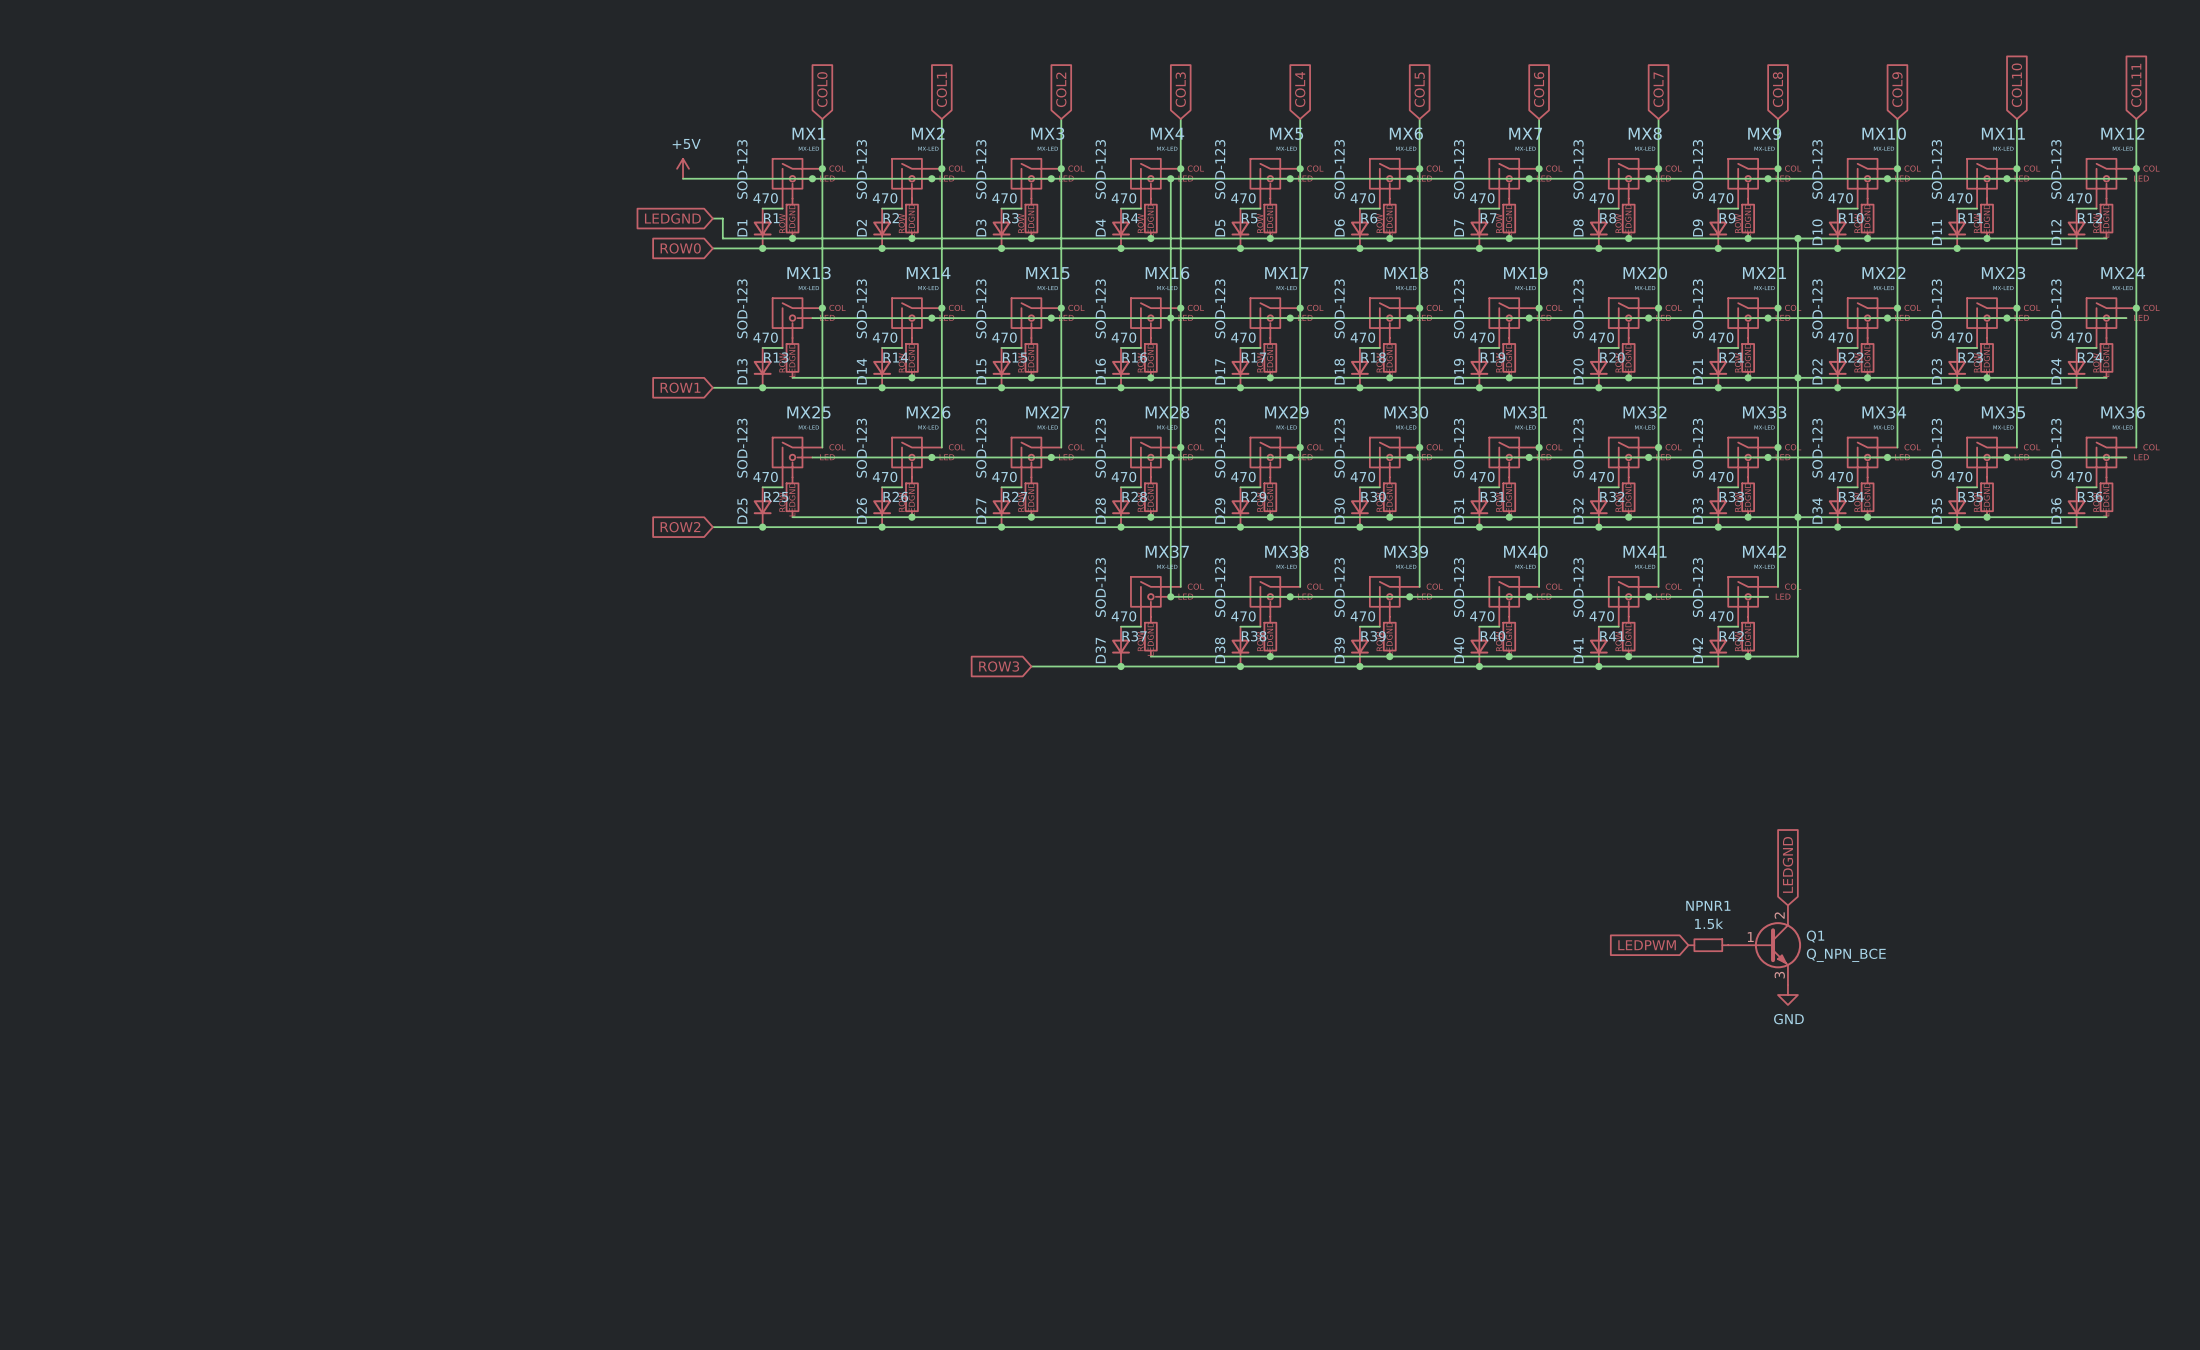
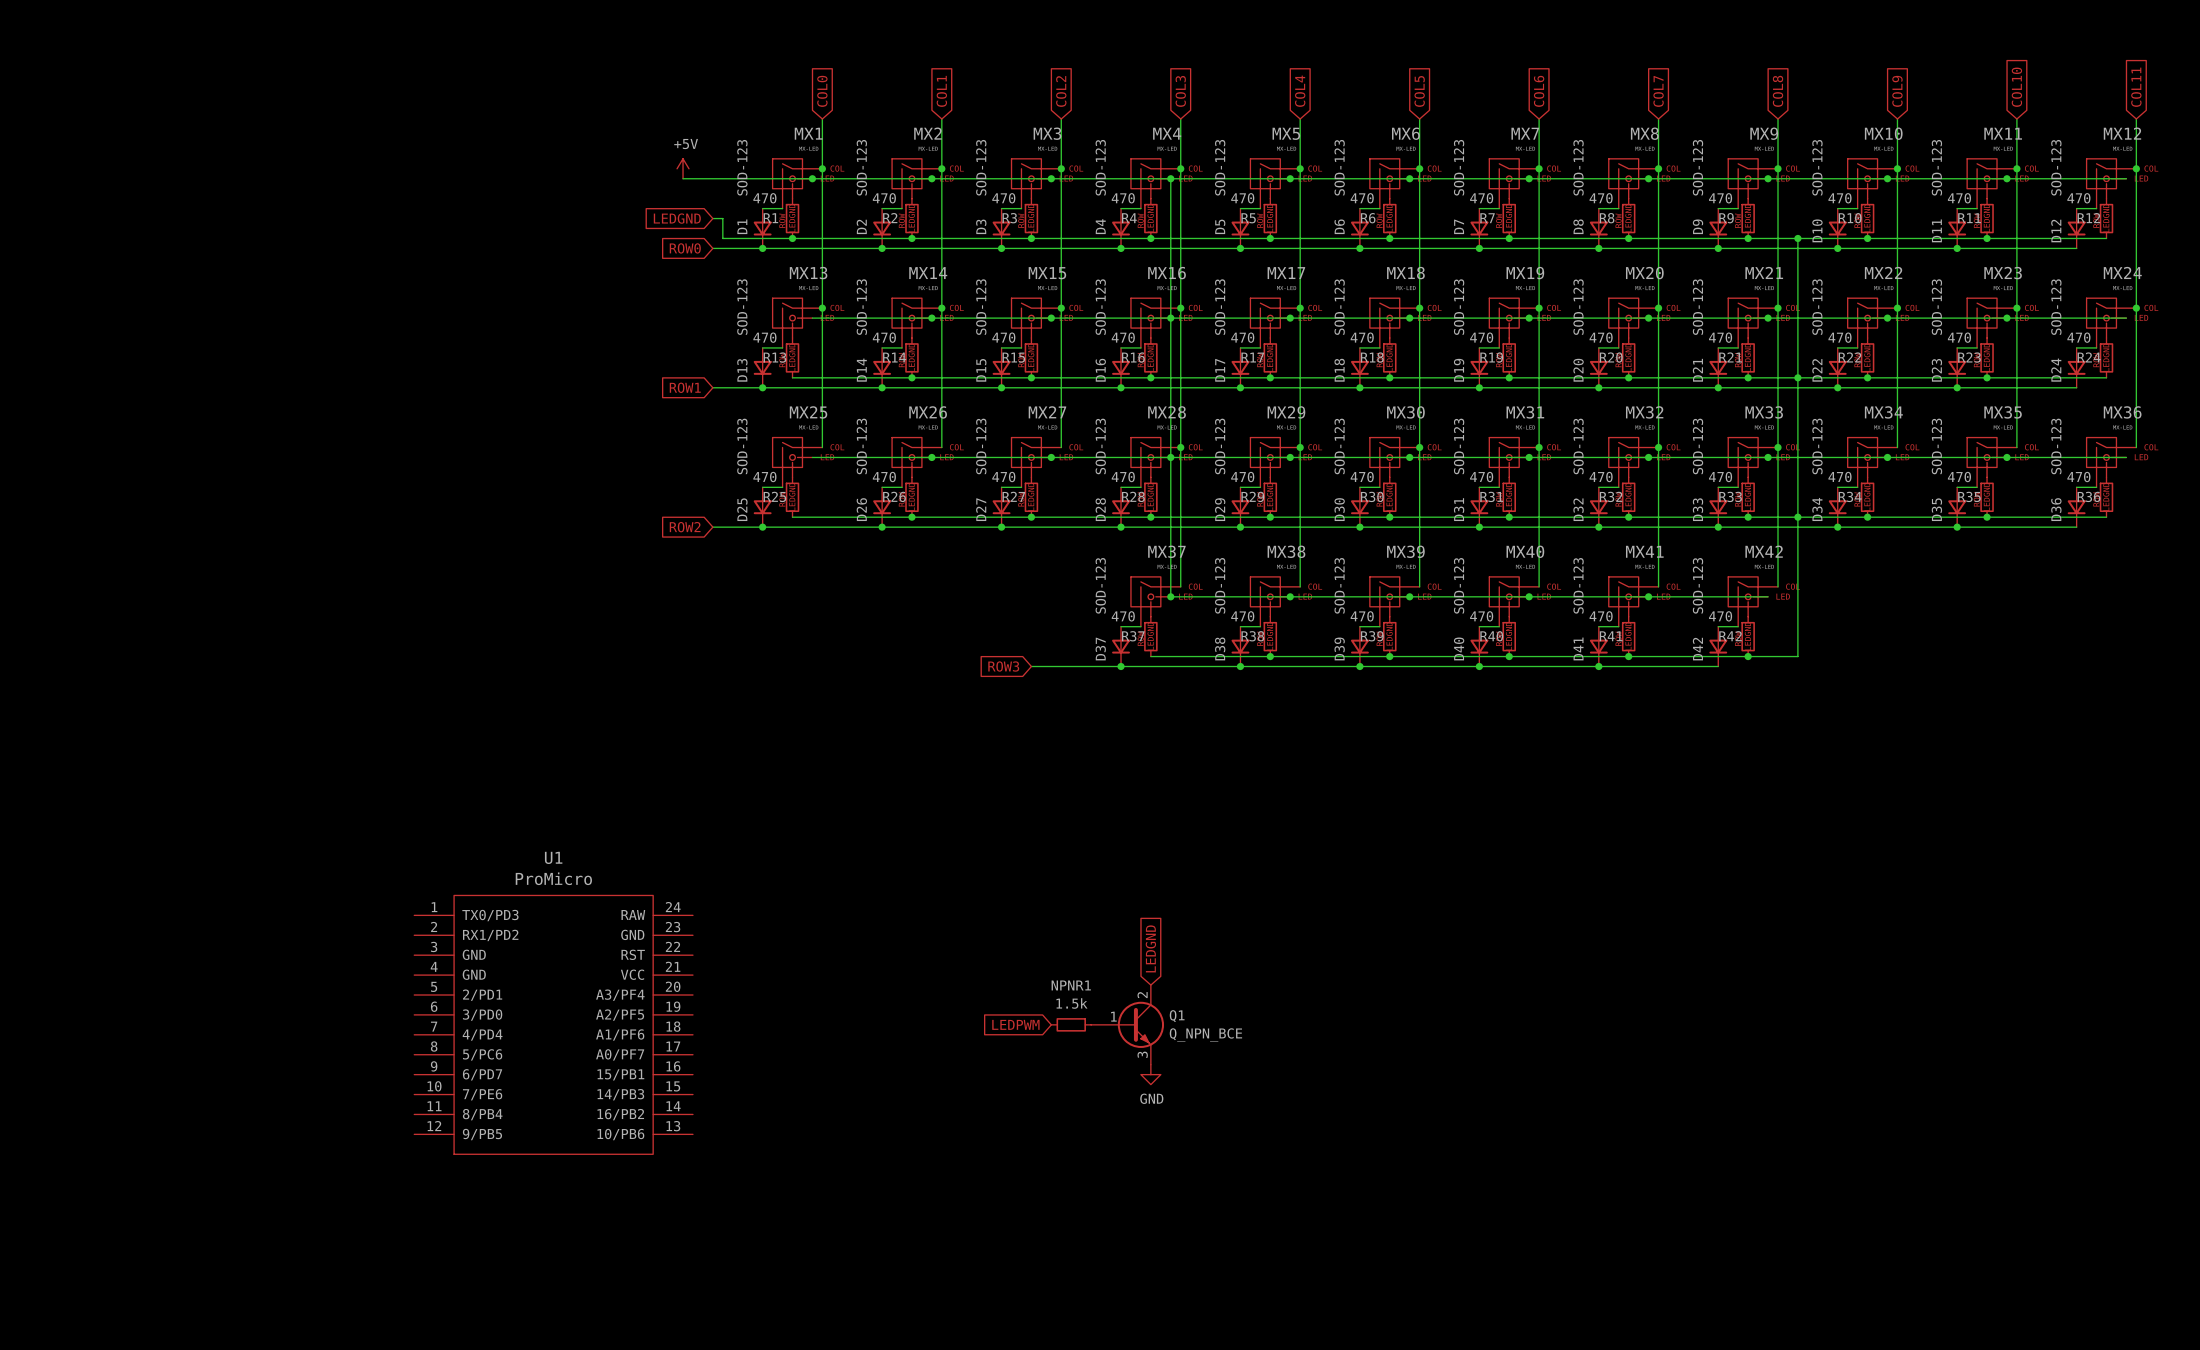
global label: LEDGND (1787, 864) -> none
global label: none -> LEDGND (1150, 948)
global label: LEDPWM (1647, 945) -> none
NPNR1 position: (1708, 945) -> (1071, 1024)
Q1 position: (1764, 945) -> (1127, 1024)
power symbol: GND (1787, 995) -> none
U1: none -> ProMicro (553, 1024)
global label: none -> LEDPWM (1015, 1024)
power symbol: none -> GND (1150, 1074)

